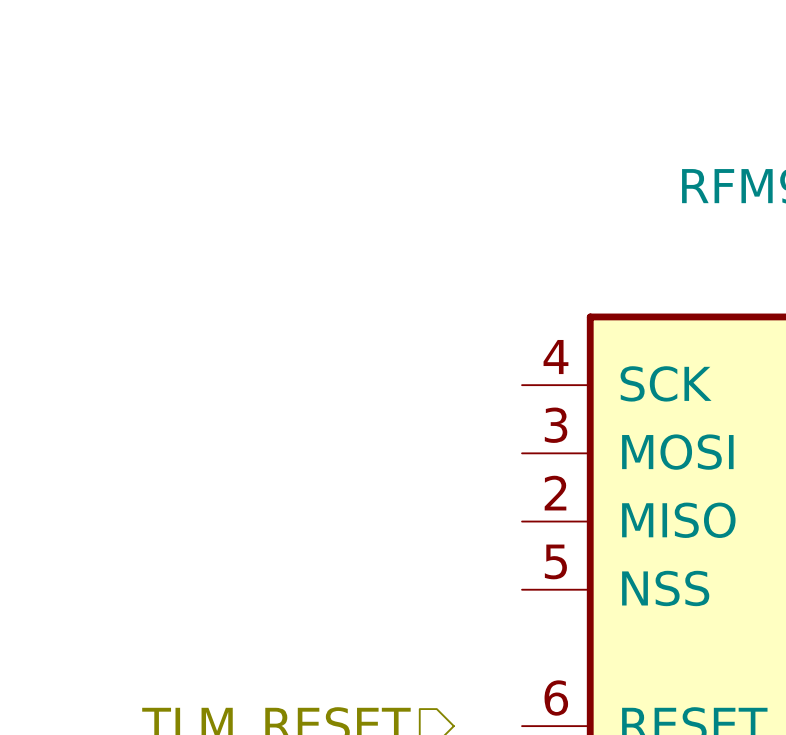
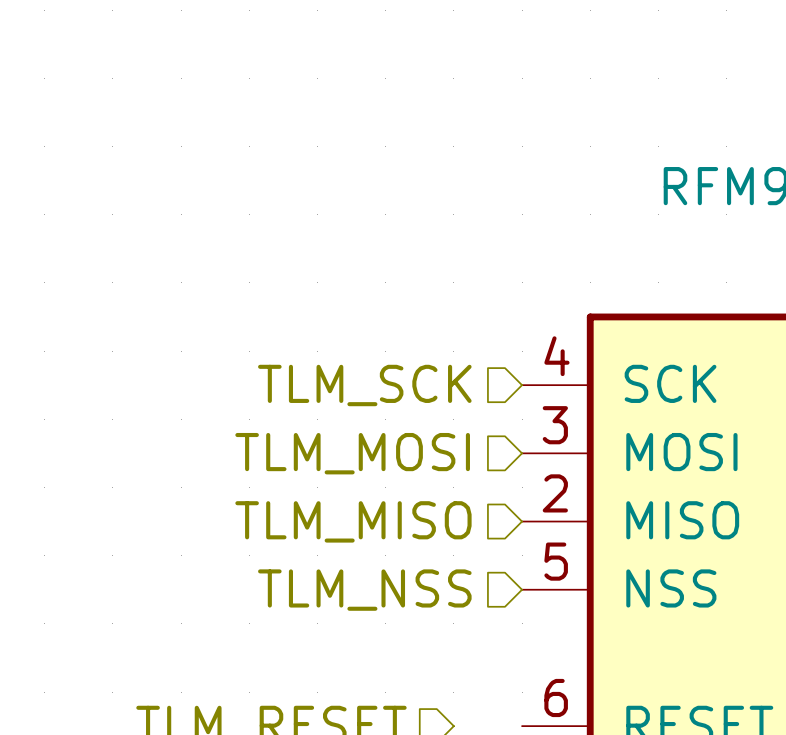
hierarchical label: none -> TLM_SCK (364, 385)
hierarchical label: none -> TLM_MOSI (352, 453)
hierarchical label: none -> TLM_MISO (353, 521)
hierarchical label: none -> TLM_NSS (364, 590)

